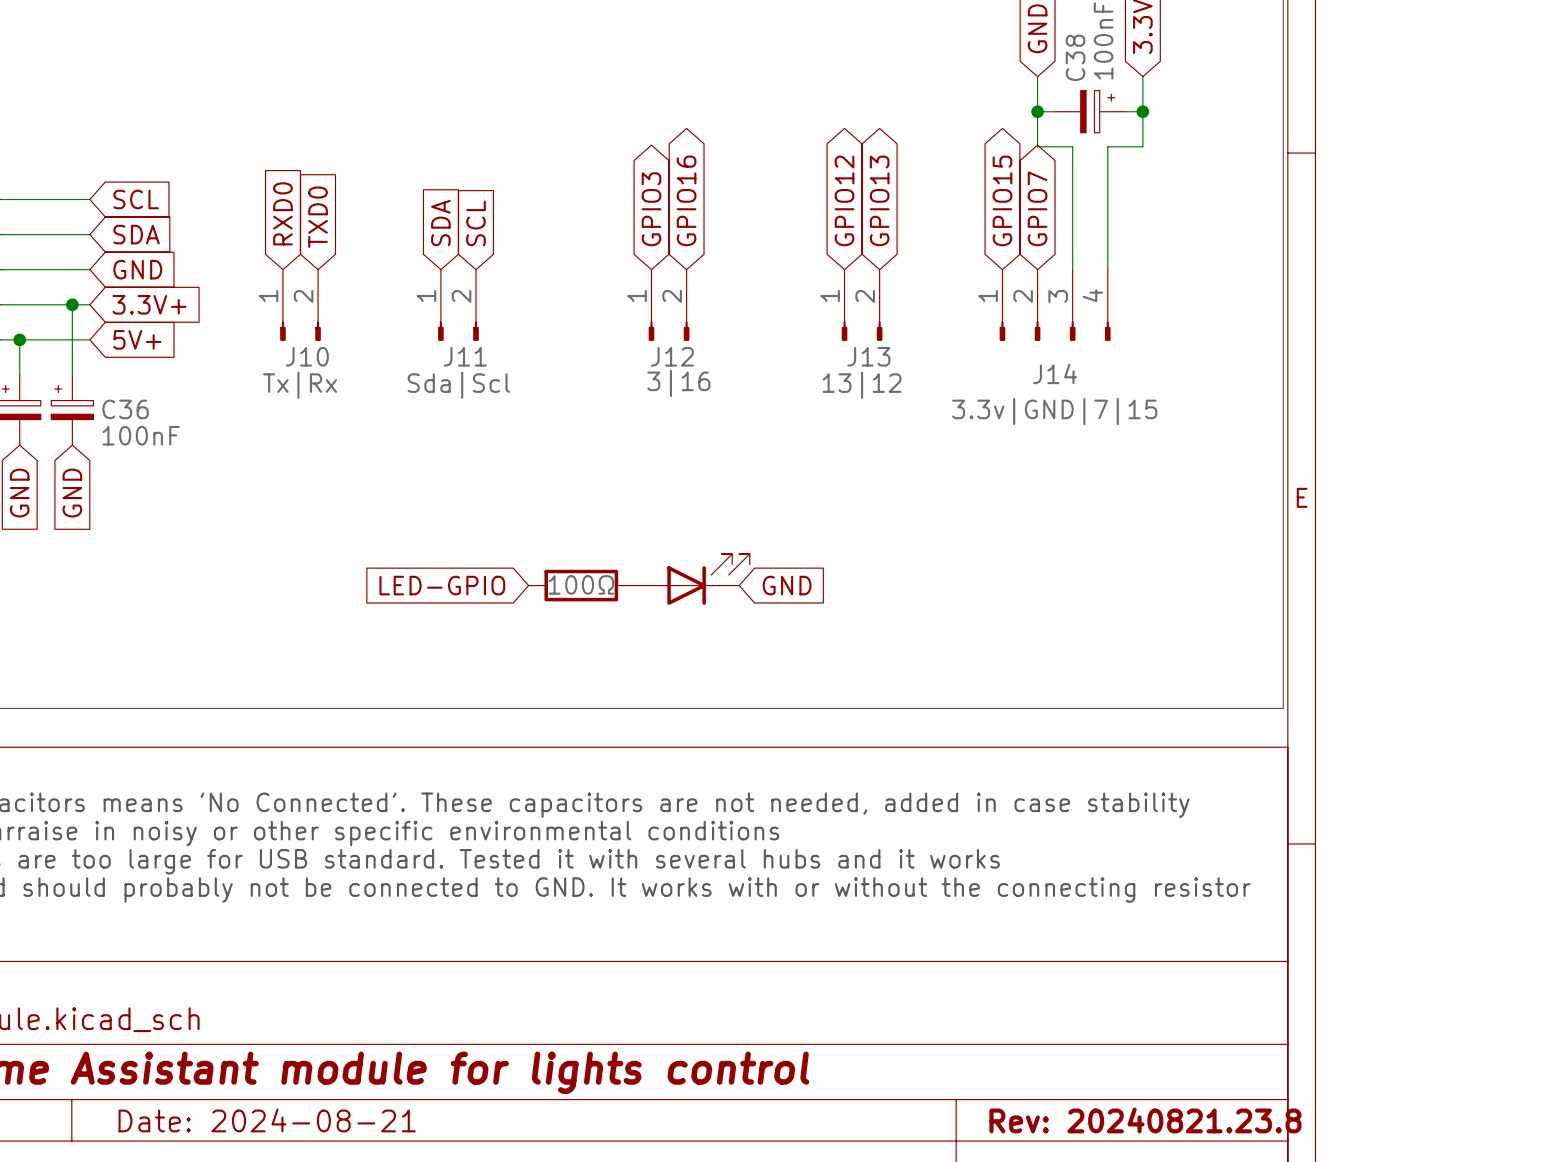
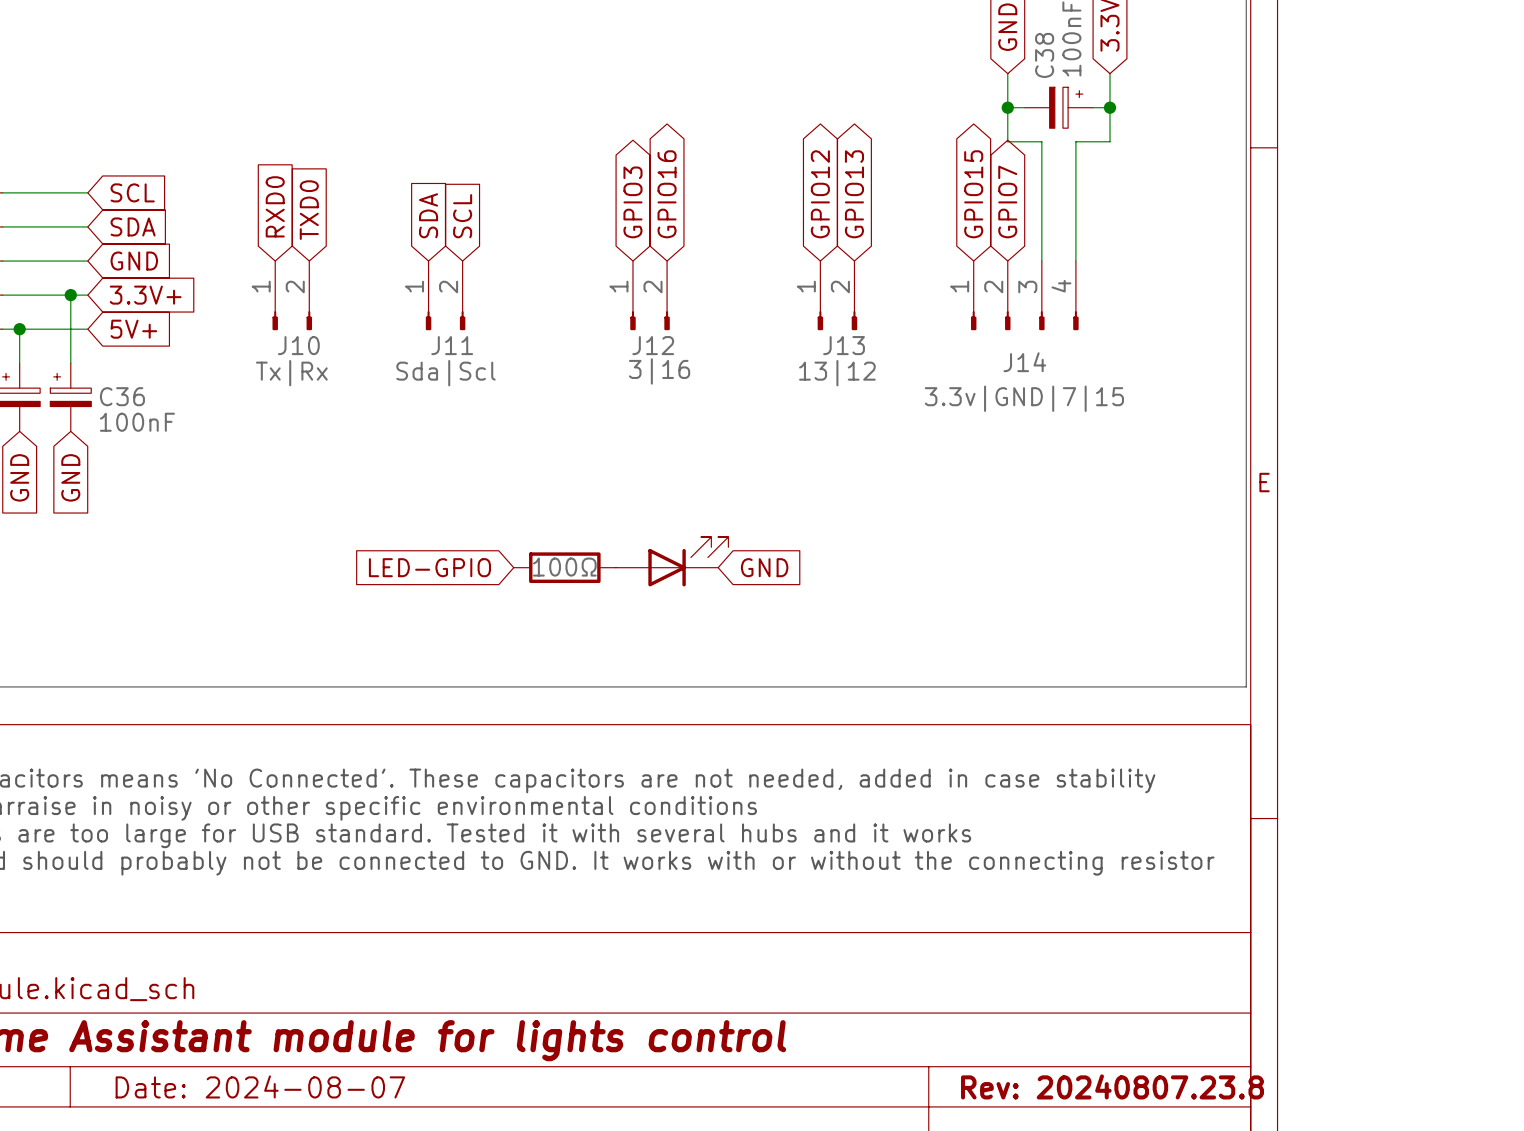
title block: Date: 2024-08-21 (267, 1120) -> Date: 2024-08-07 (260, 1086)
title block: Rev: 20240821.23.8 (1145, 1120) -> Rev: 20240807.23.8 (1112, 1086)

